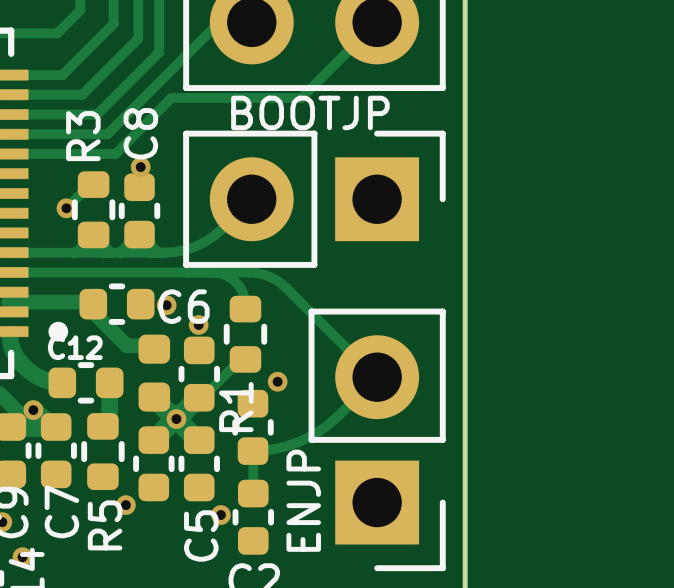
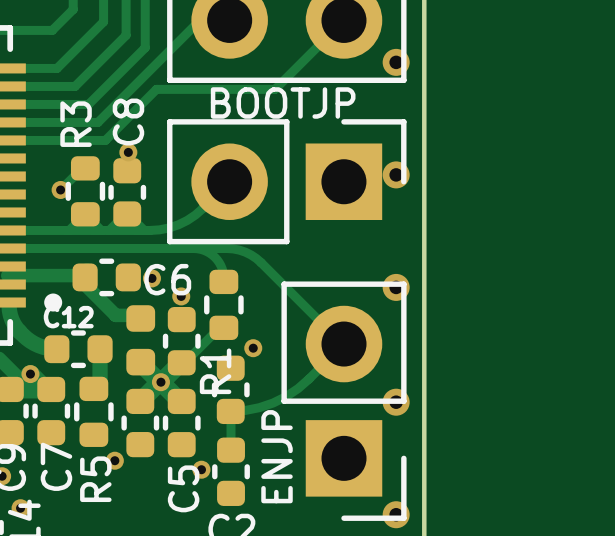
via: none -> (396, 62)
via: none -> (396, 174)
via: none -> (396, 287)
via: none -> (396, 402)
via: none -> (396, 514)

